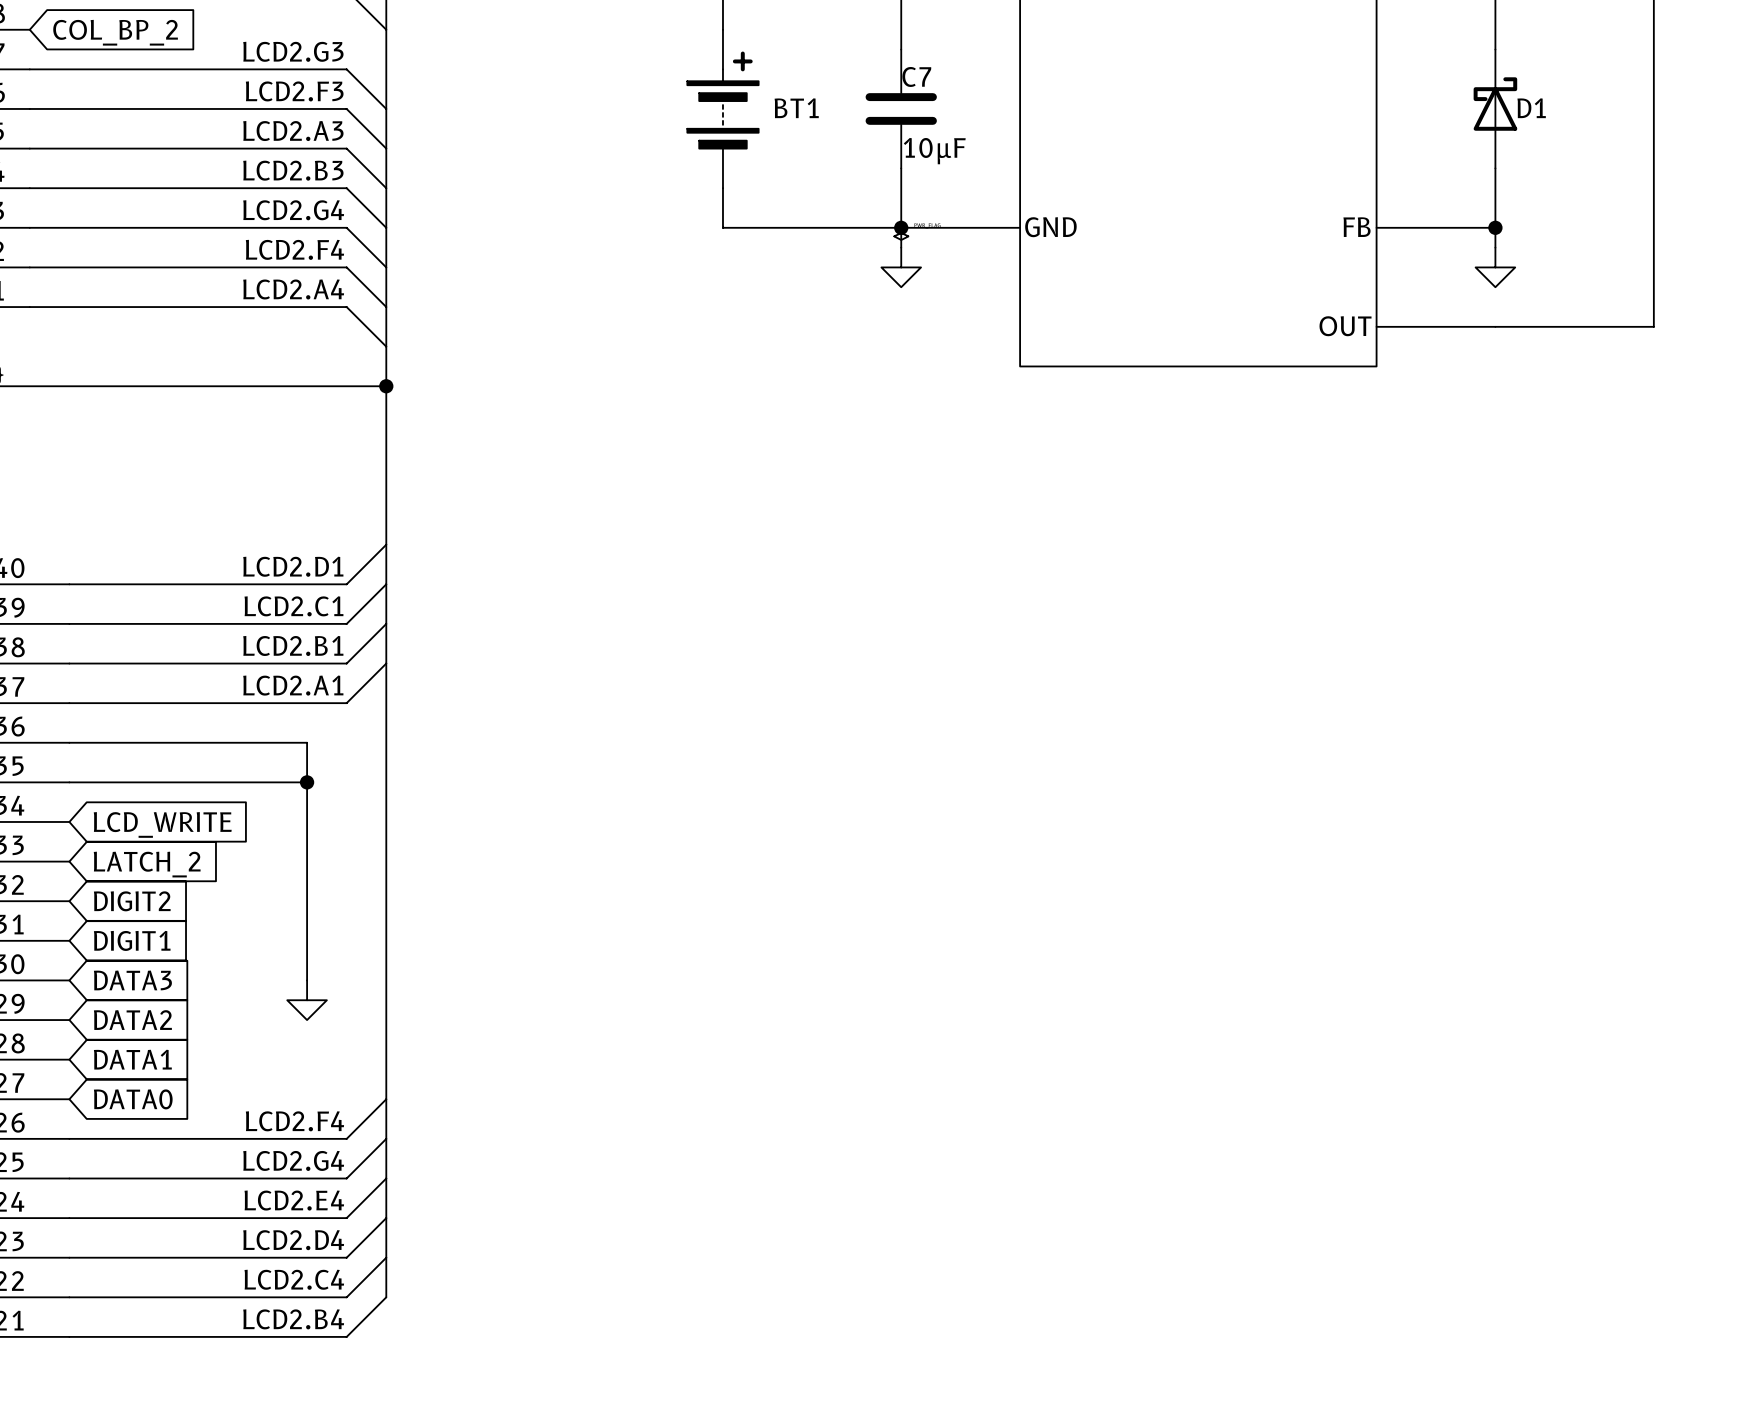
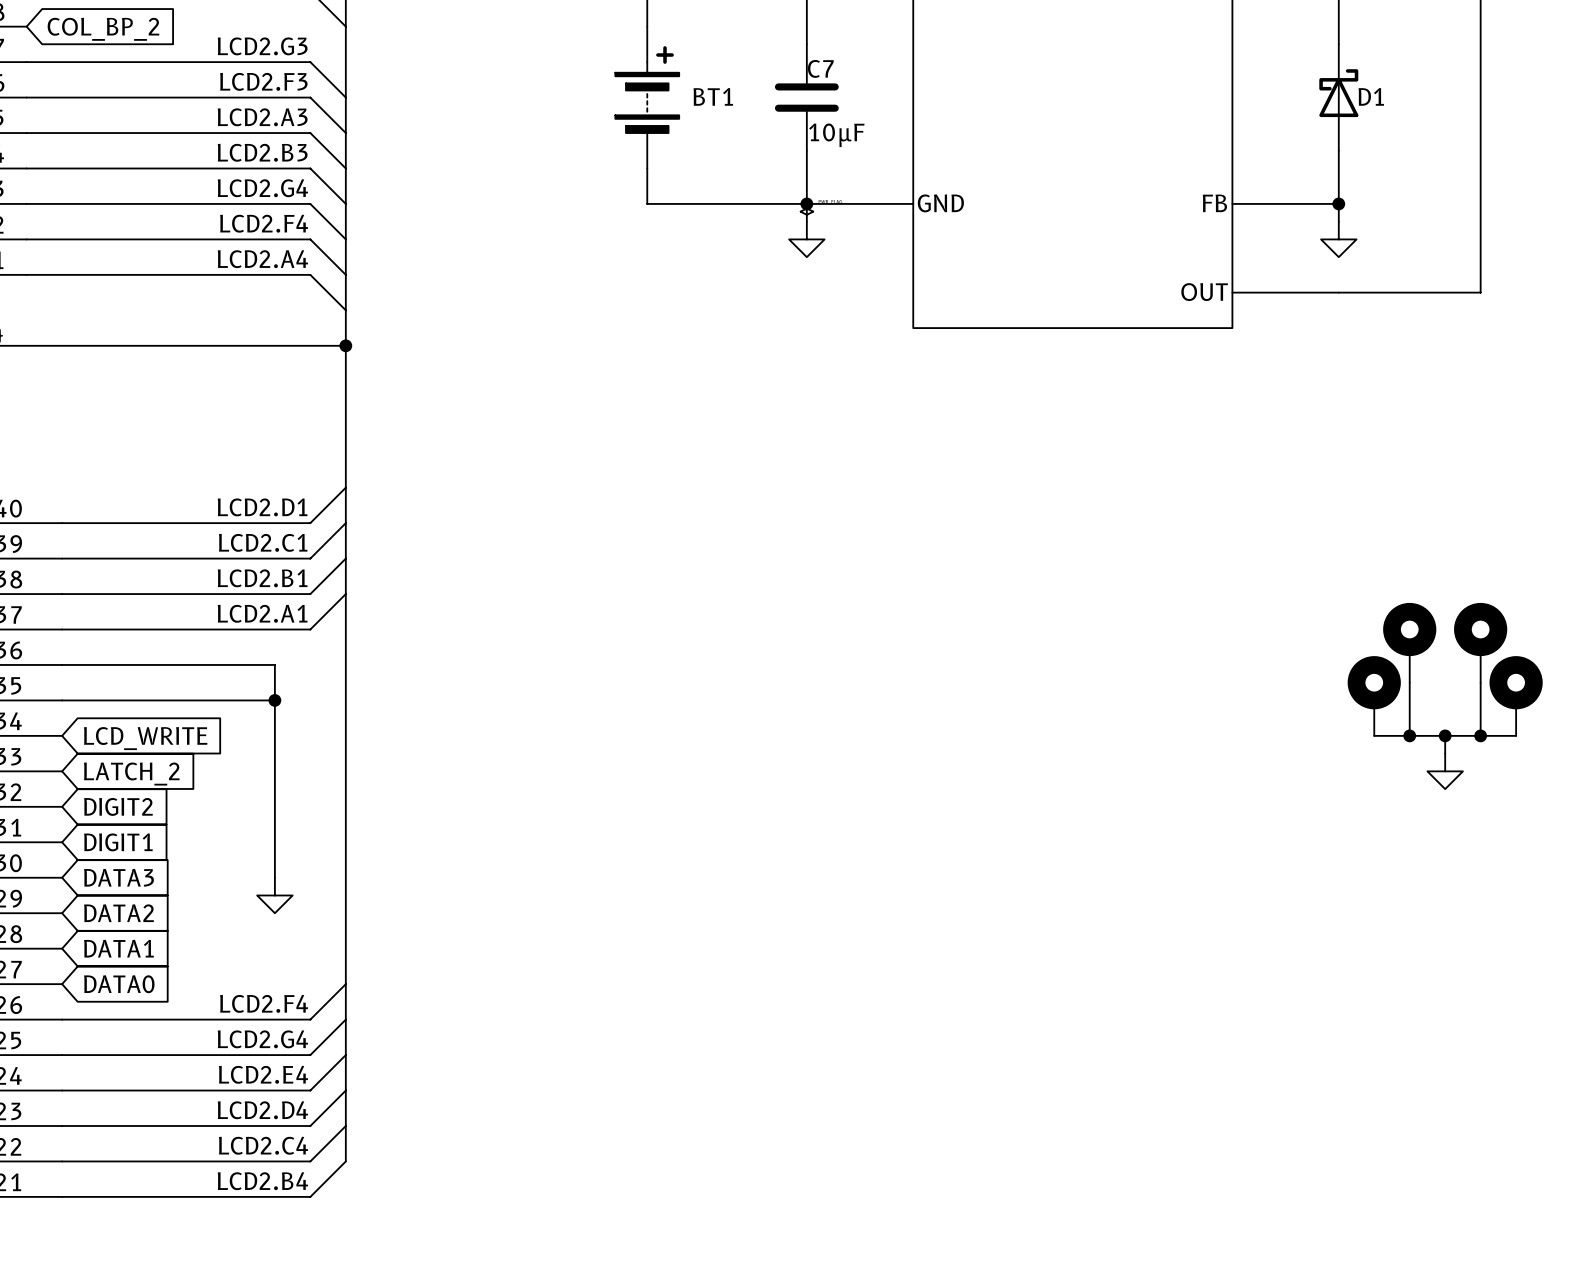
part: none -> (1409, 642)
part: none -> (1480, 642)
wire: none -> (1409, 682) (1409, 735)
wire: none -> (1480, 682) (1480, 735)
part: none -> (1374, 696)
part: none -> (1516, 696)
wire: none -> (1374, 735) (1516, 735)
junction: none -> (1409, 735)
wire: none -> (1445, 735) (1445, 753)
junction: none -> (1445, 735)
junction: none -> (1480, 735)
power symbol: none -> (1445, 771)

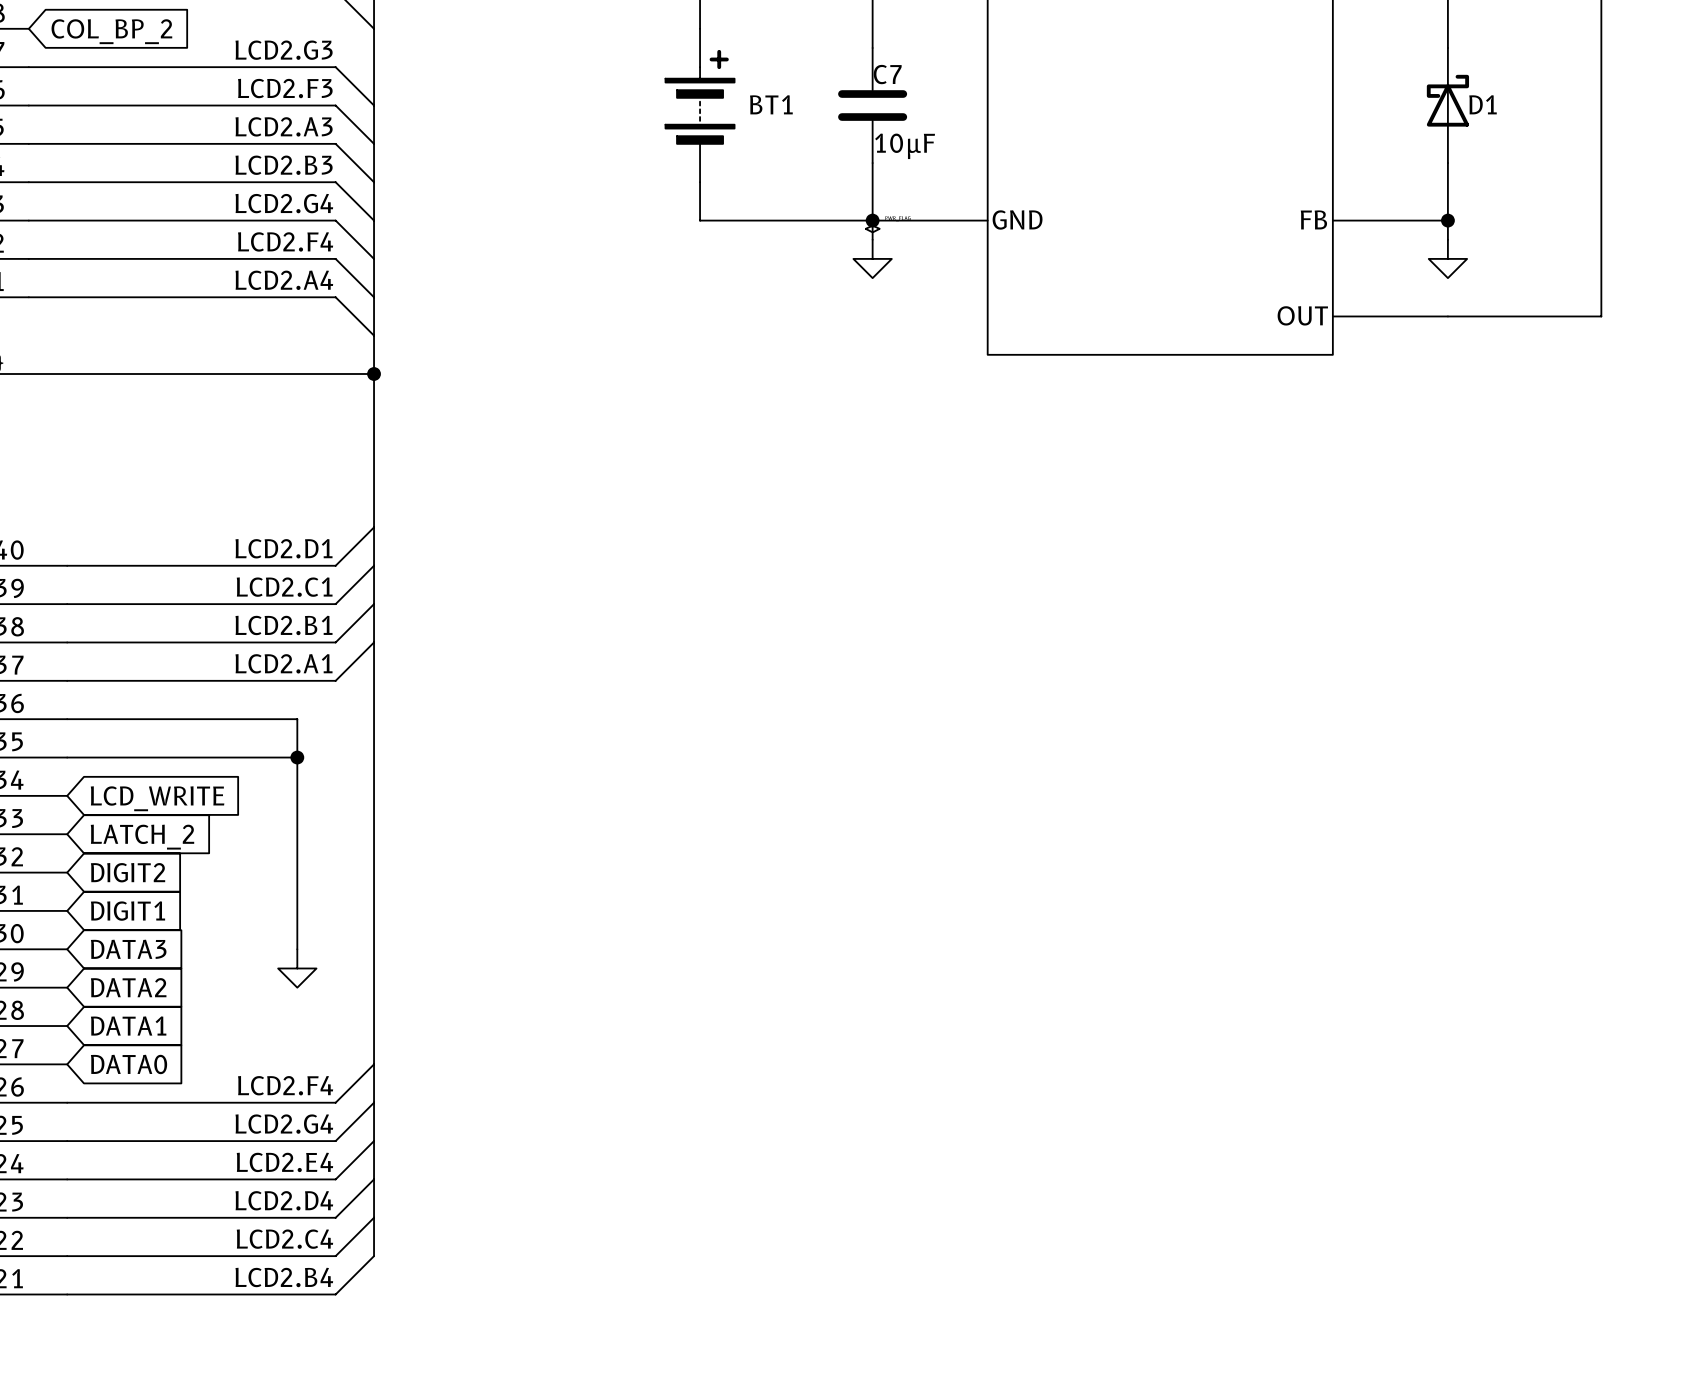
part: (1409, 642) -> none
part: (1480, 642) -> none
wire: (1409, 682) (1409, 735) -> none
wire: (1480, 682) (1480, 735) -> none
part: (1374, 696) -> none
part: (1516, 696) -> none
wire: (1374, 735) (1516, 735) -> none
junction: (1409, 735) -> none
wire: (1445, 735) (1445, 753) -> none
junction: (1445, 735) -> none
junction: (1480, 735) -> none
power symbol: (1445, 771) -> none

